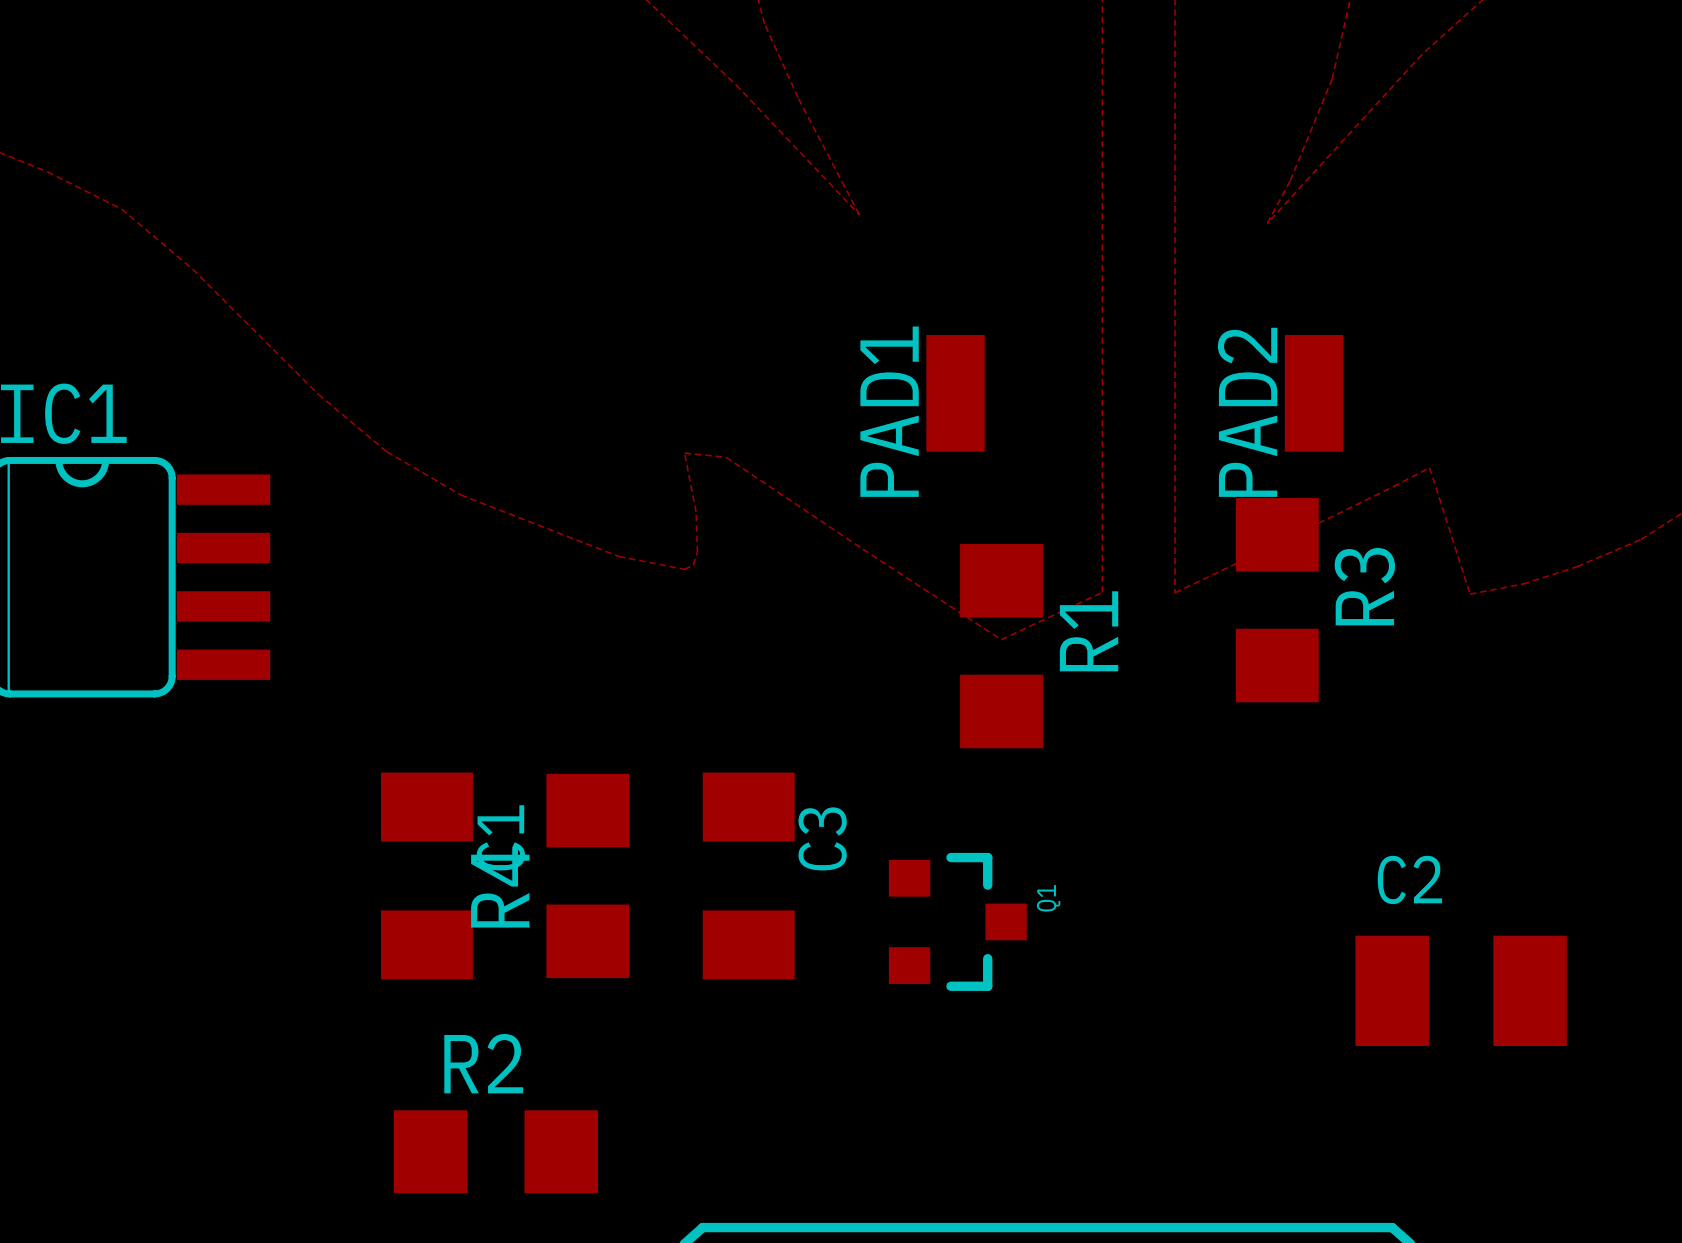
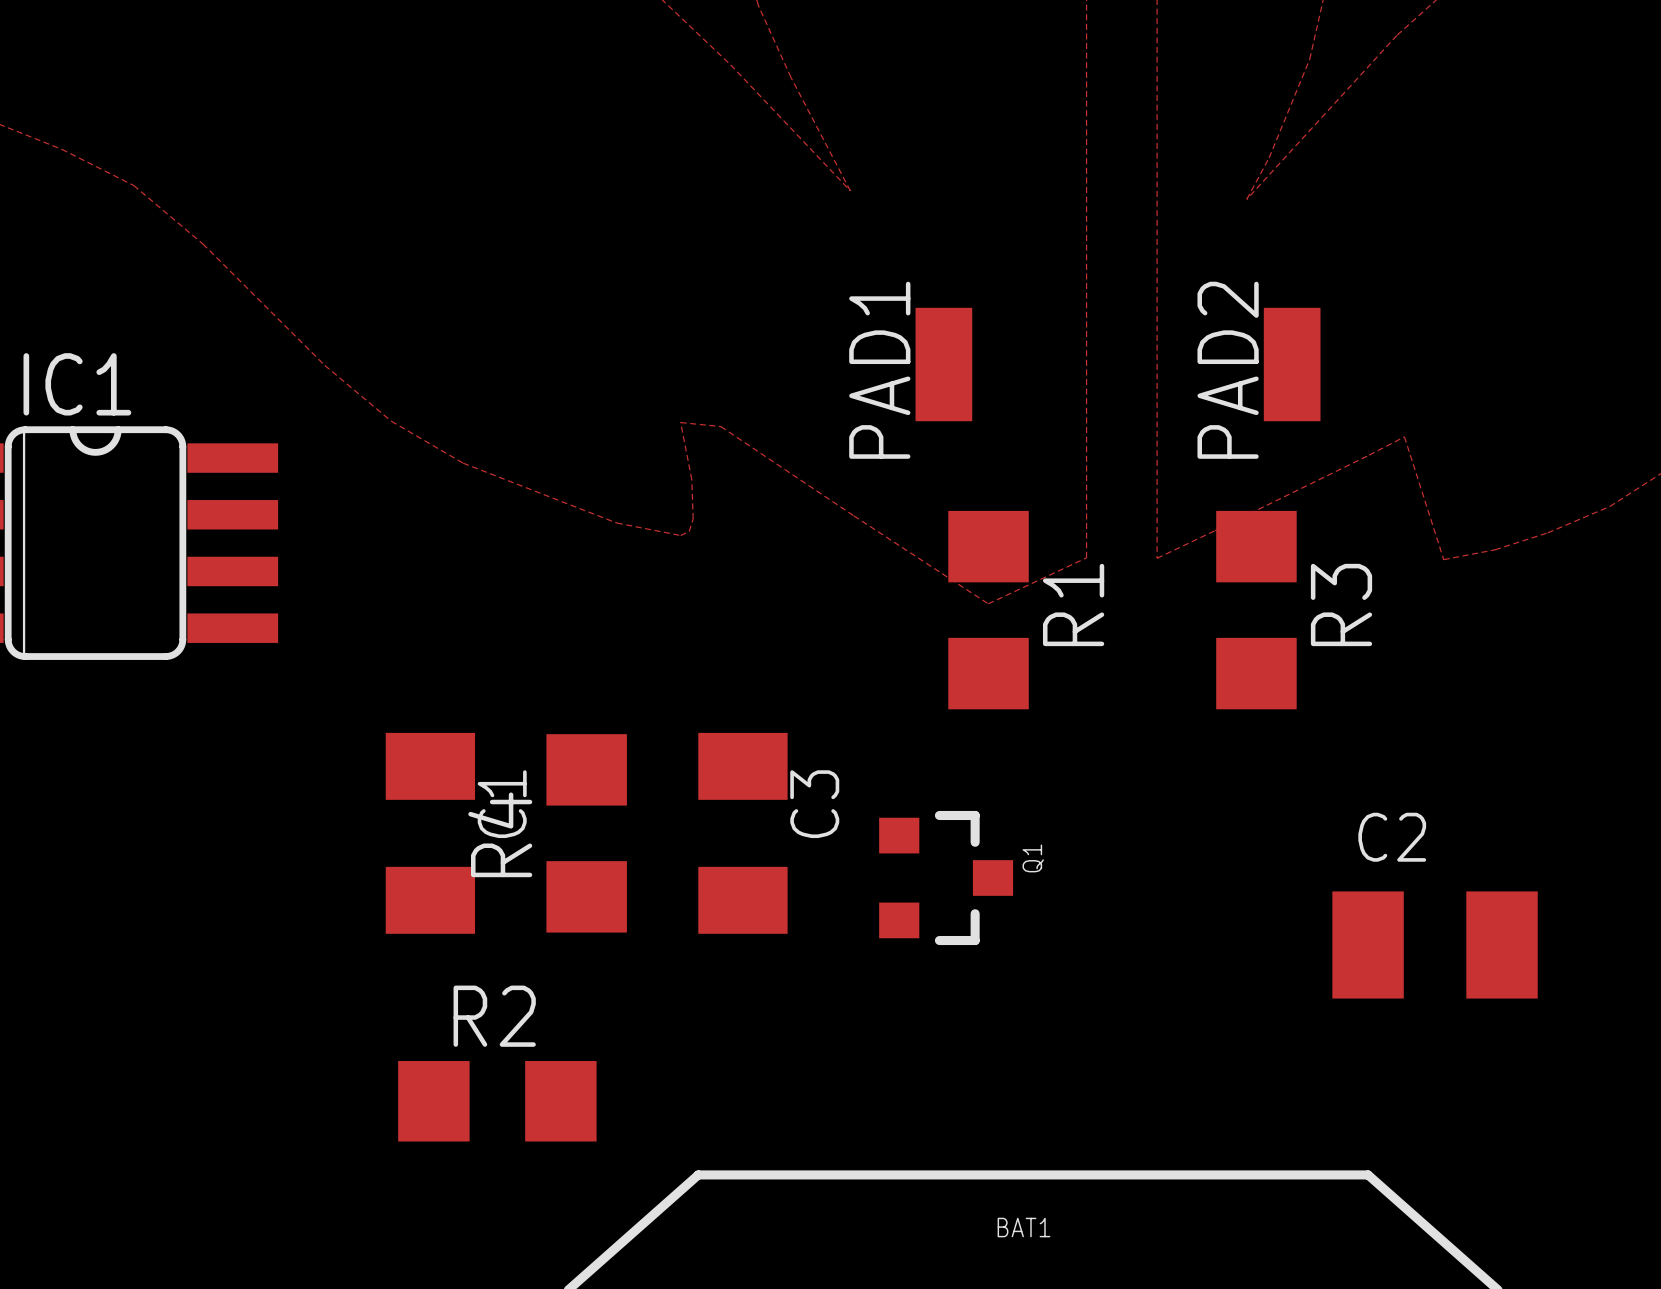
R3 position: (1277, 600) -> (1256, 610)

